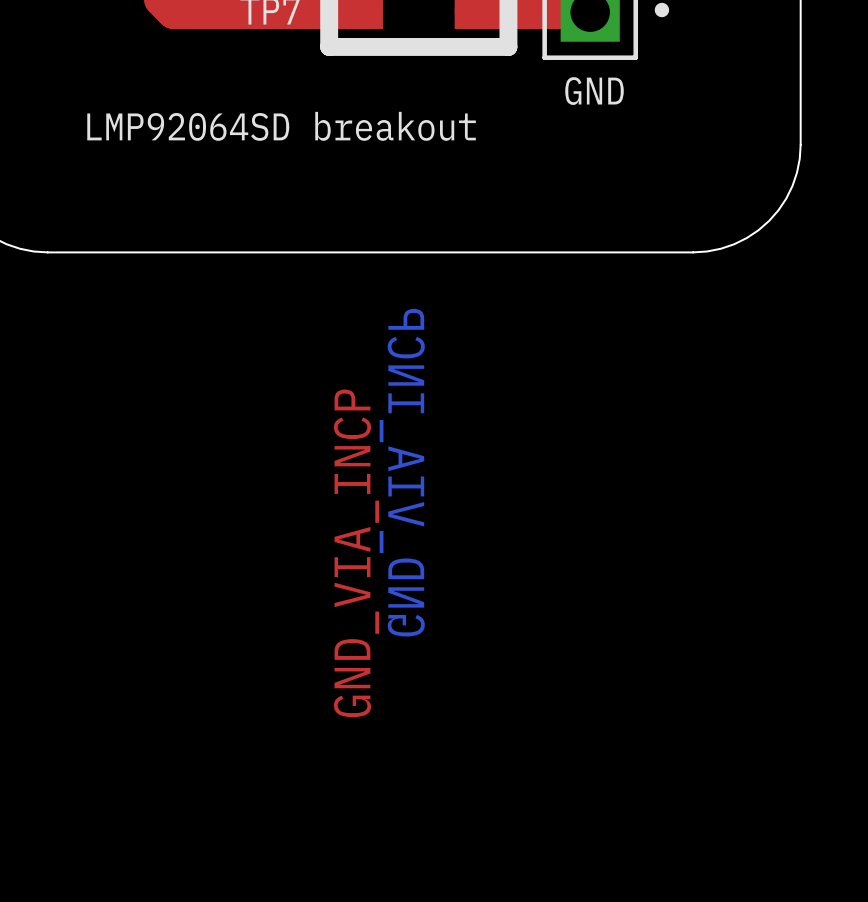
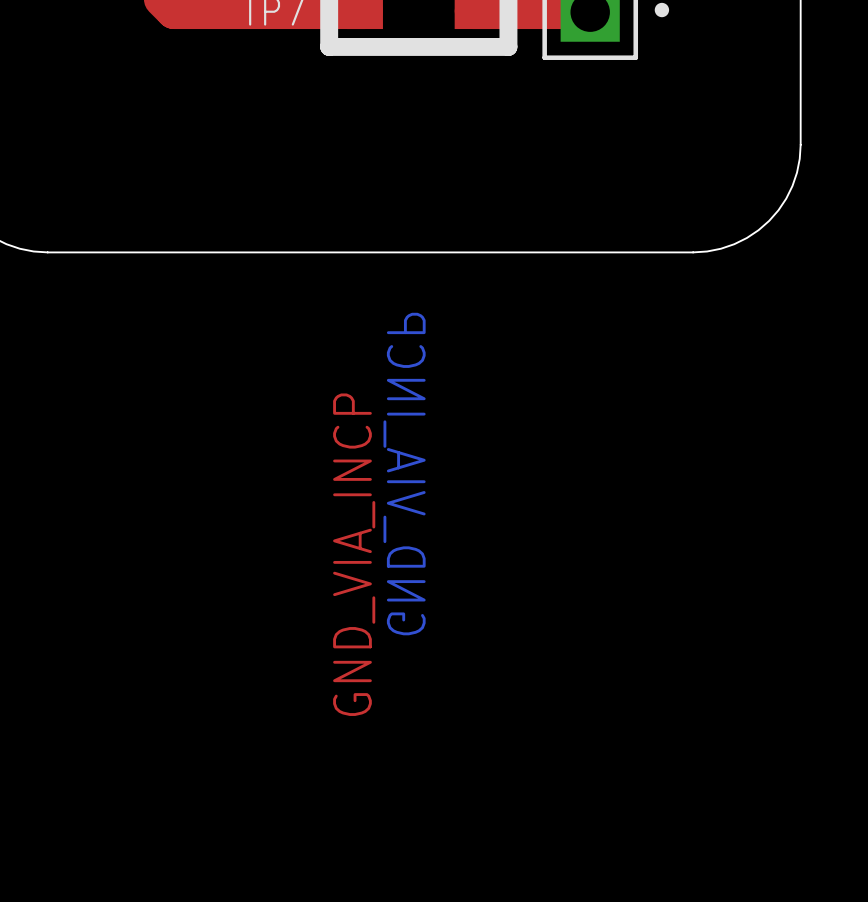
text: GND (594, 91) -> none
text: LMP92064SD breakout (281, 126) -> none

